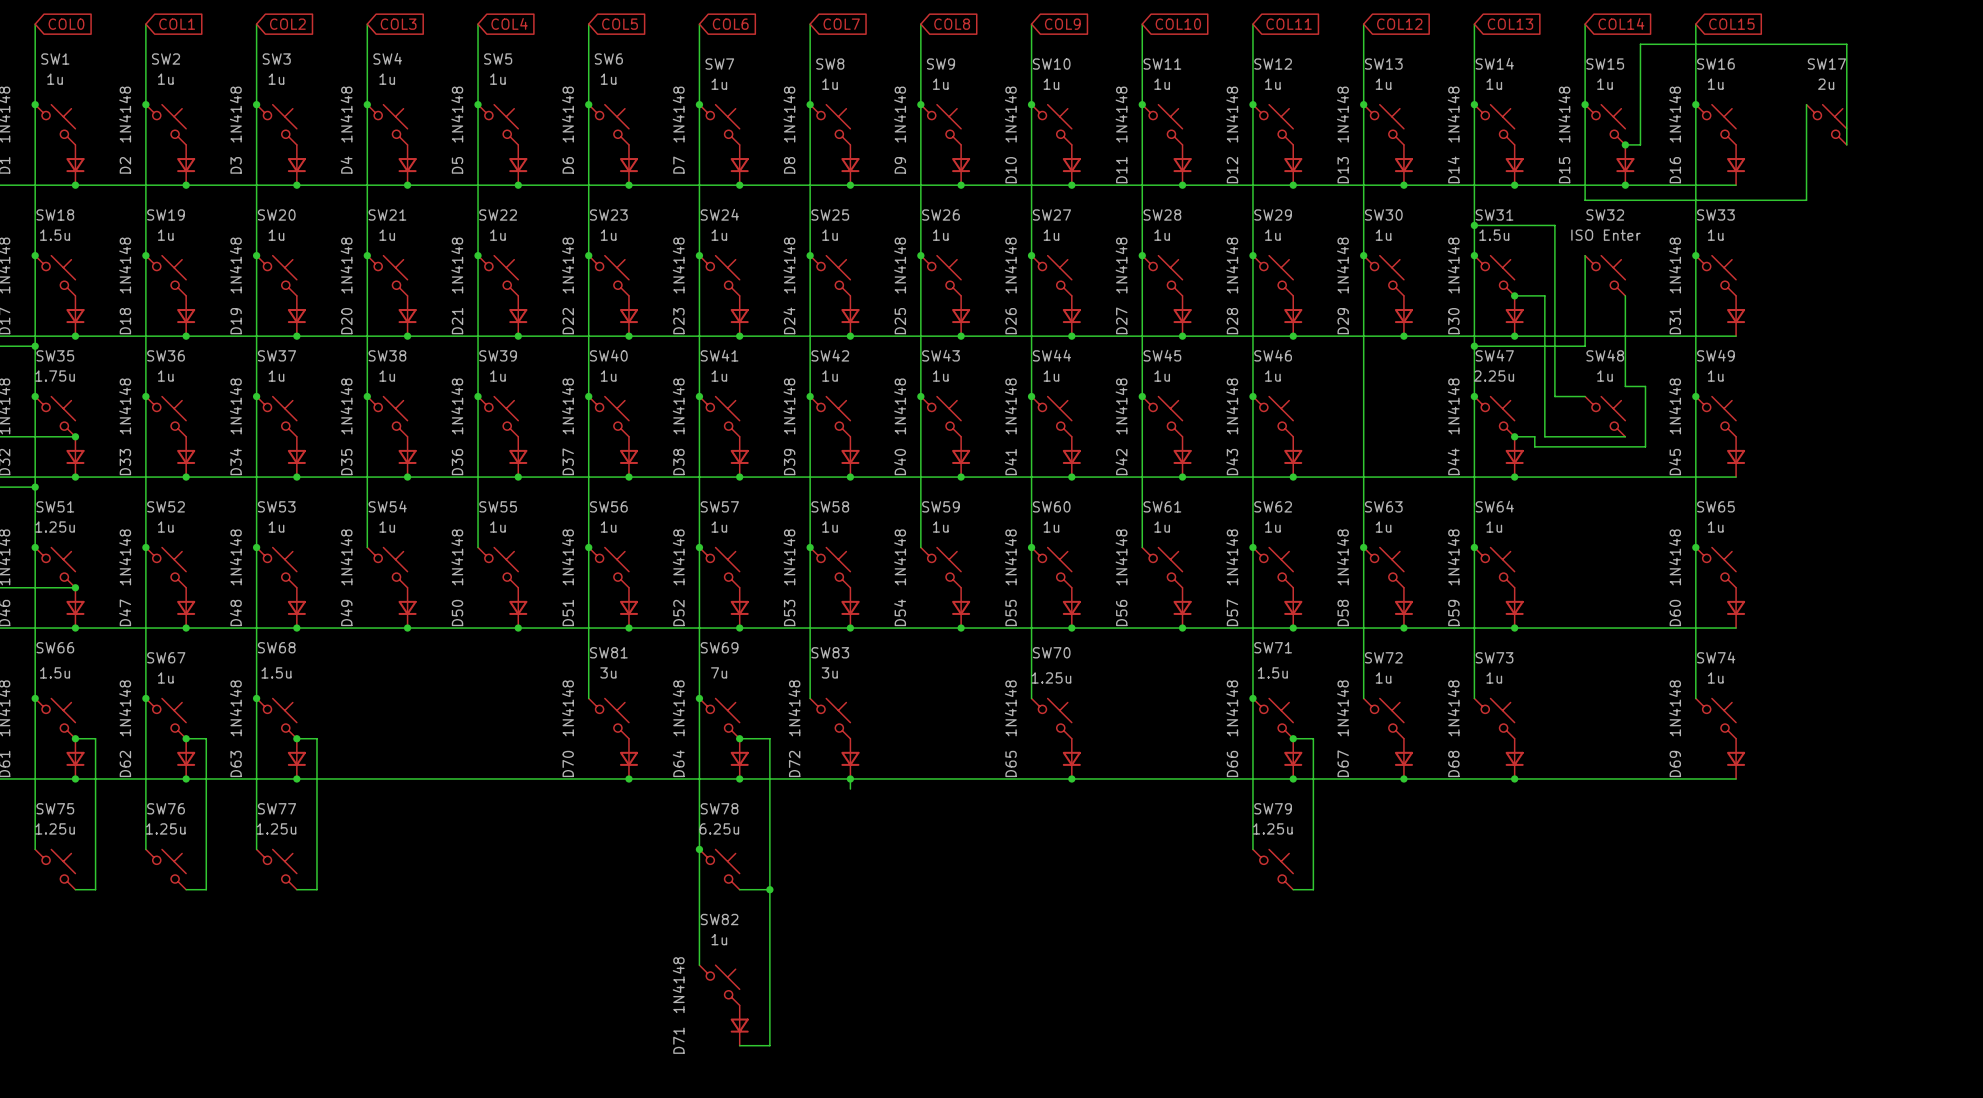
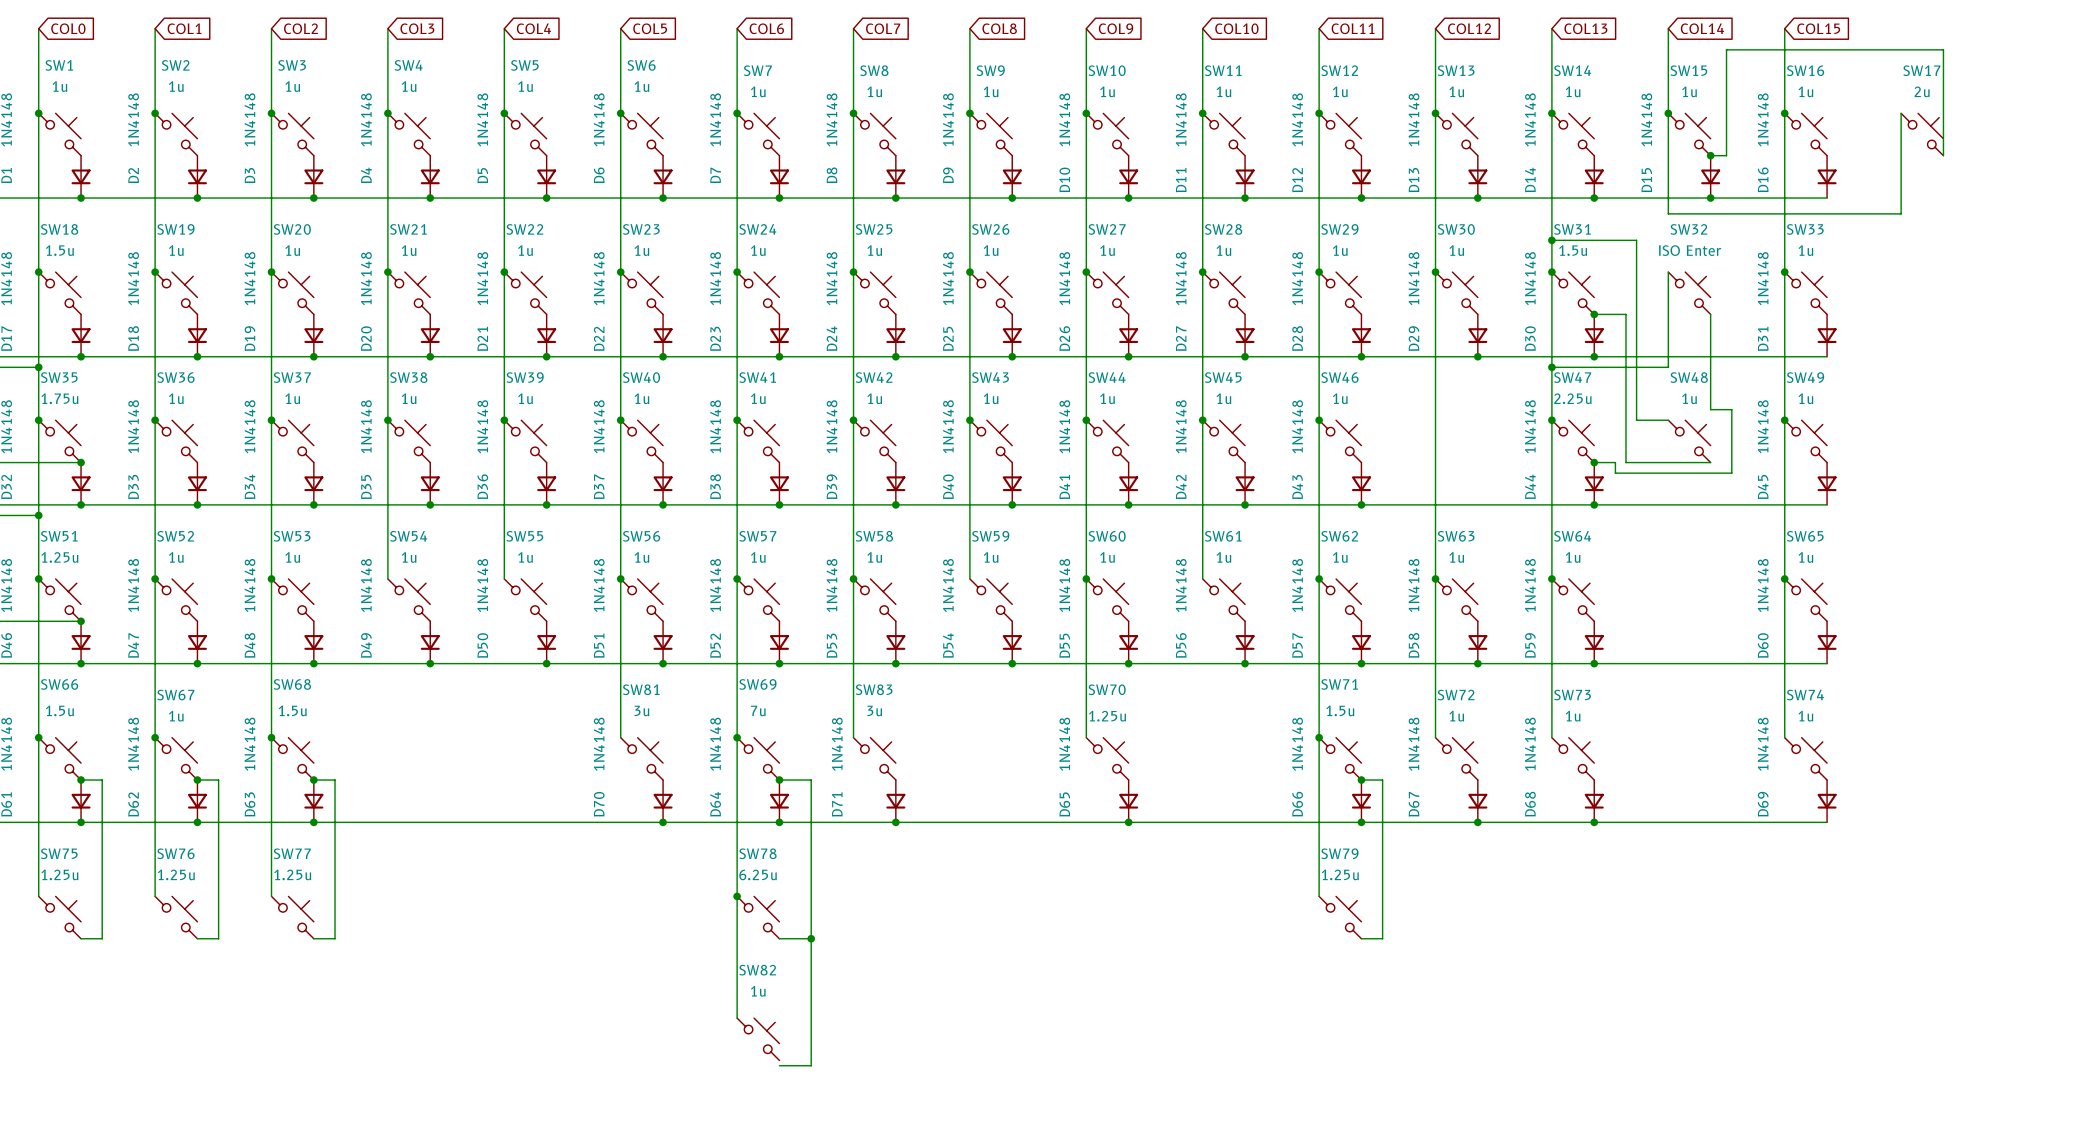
D72 name: D72 (794, 763) -> D71 (837, 804)
wire: (850, 778) (850, 789) -> none
wire: (769, 1010) (769, 1045) (739, 1045) -> (811, 1065) (779, 1065)
D71: 1N4148 (739, 1025) -> none

